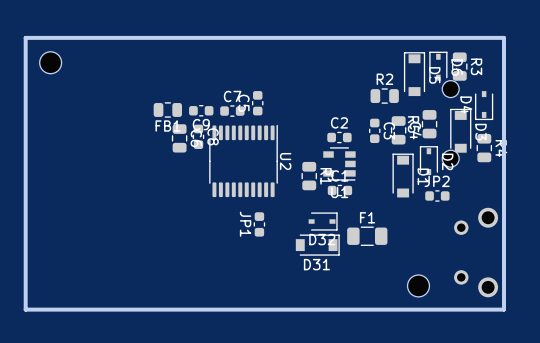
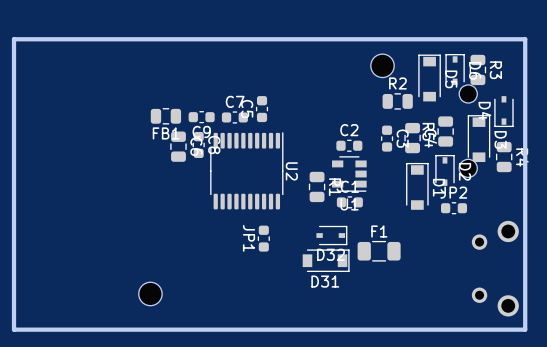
part: (50, 62) -> none
part: none -> (382, 65)
part: none -> (150, 293)
part: (418, 285) -> none

